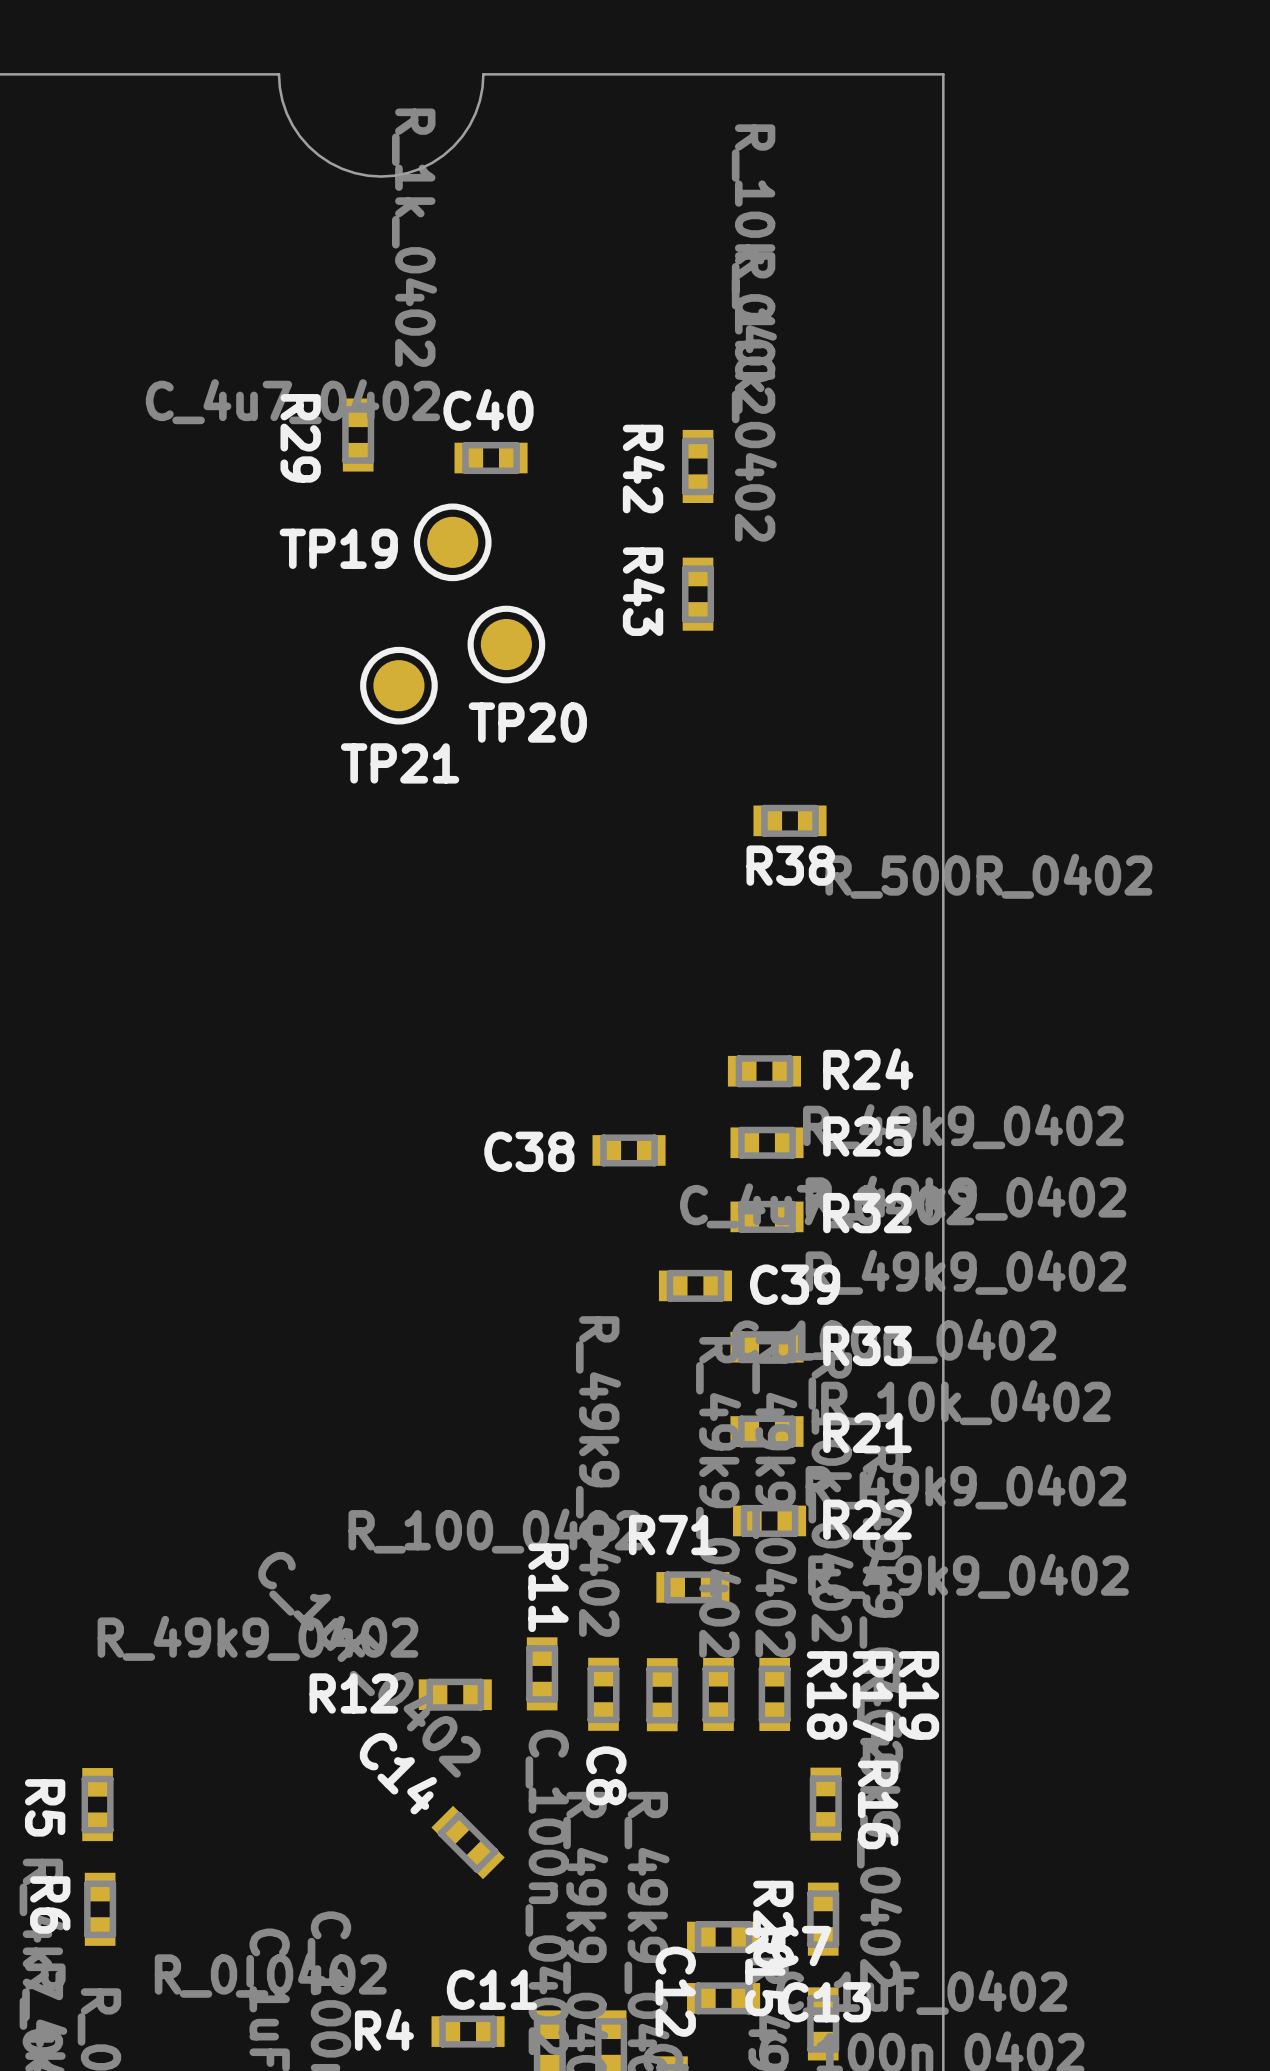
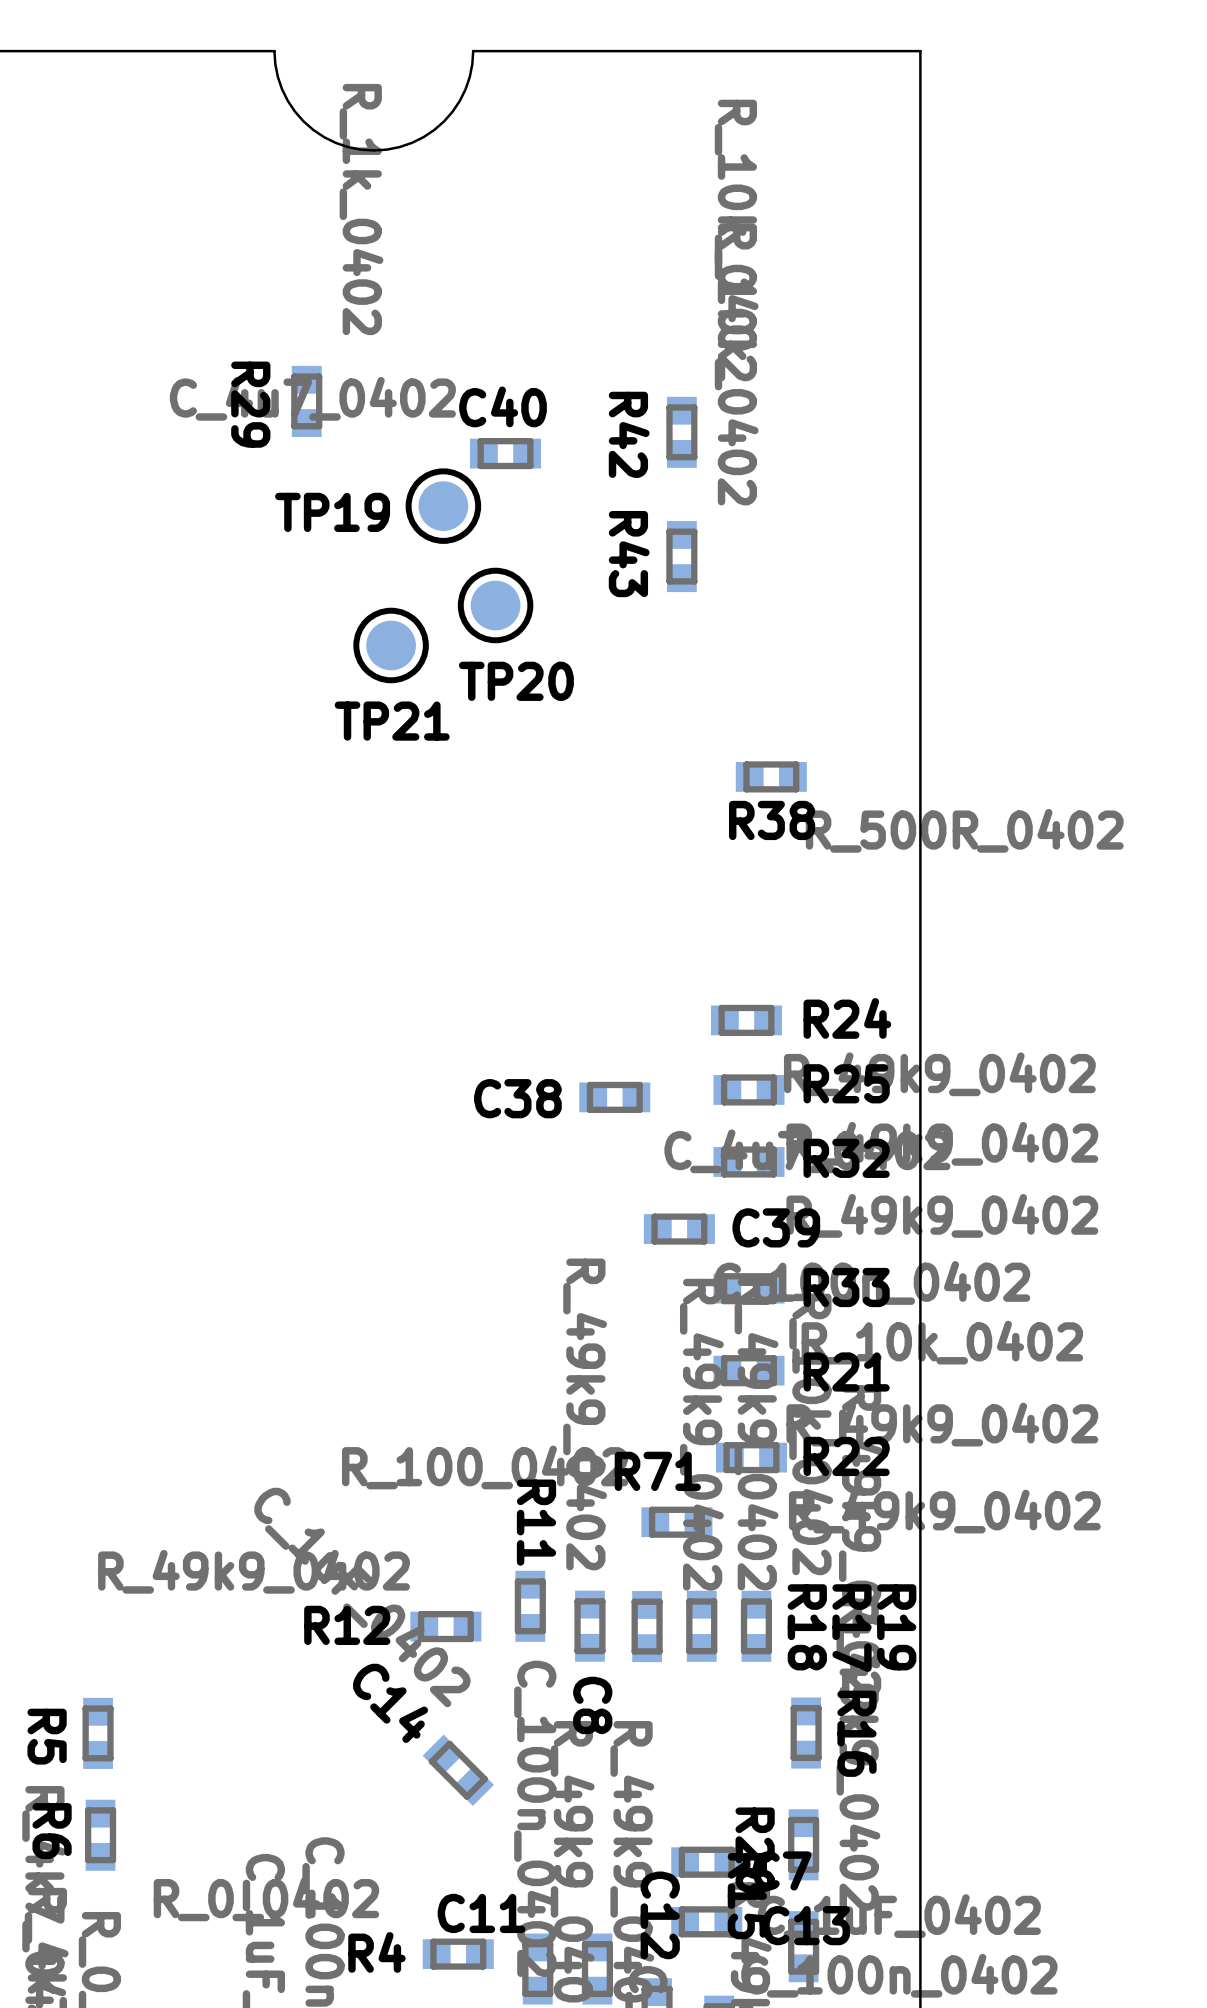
R29 position: (358, 435) -> (306, 401)
C40 position: (491, 458) -> (505, 453)

